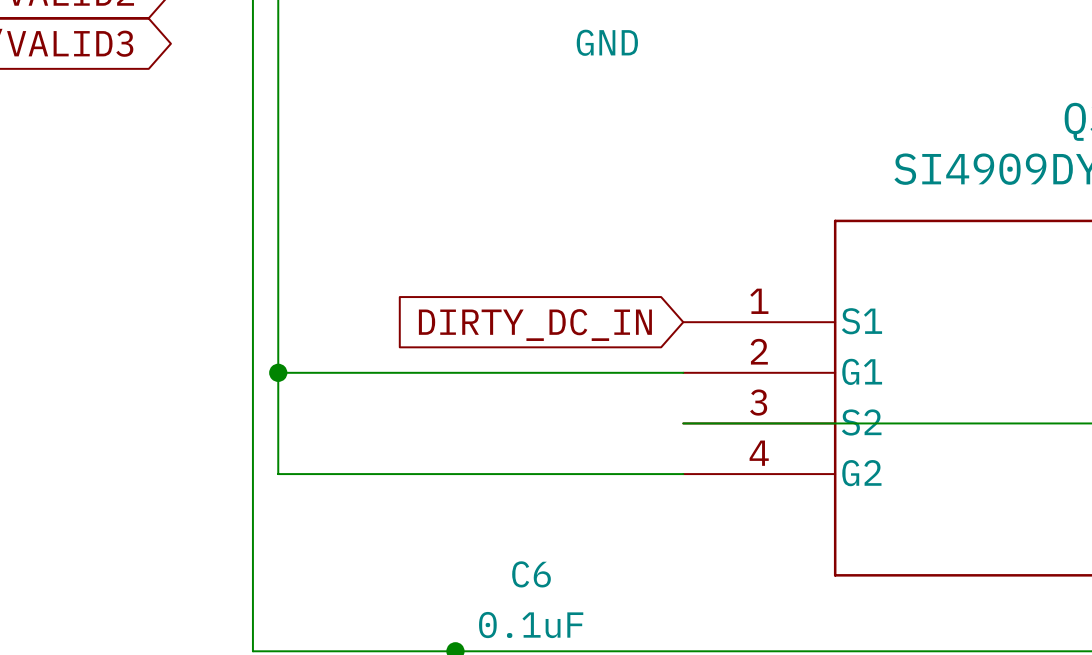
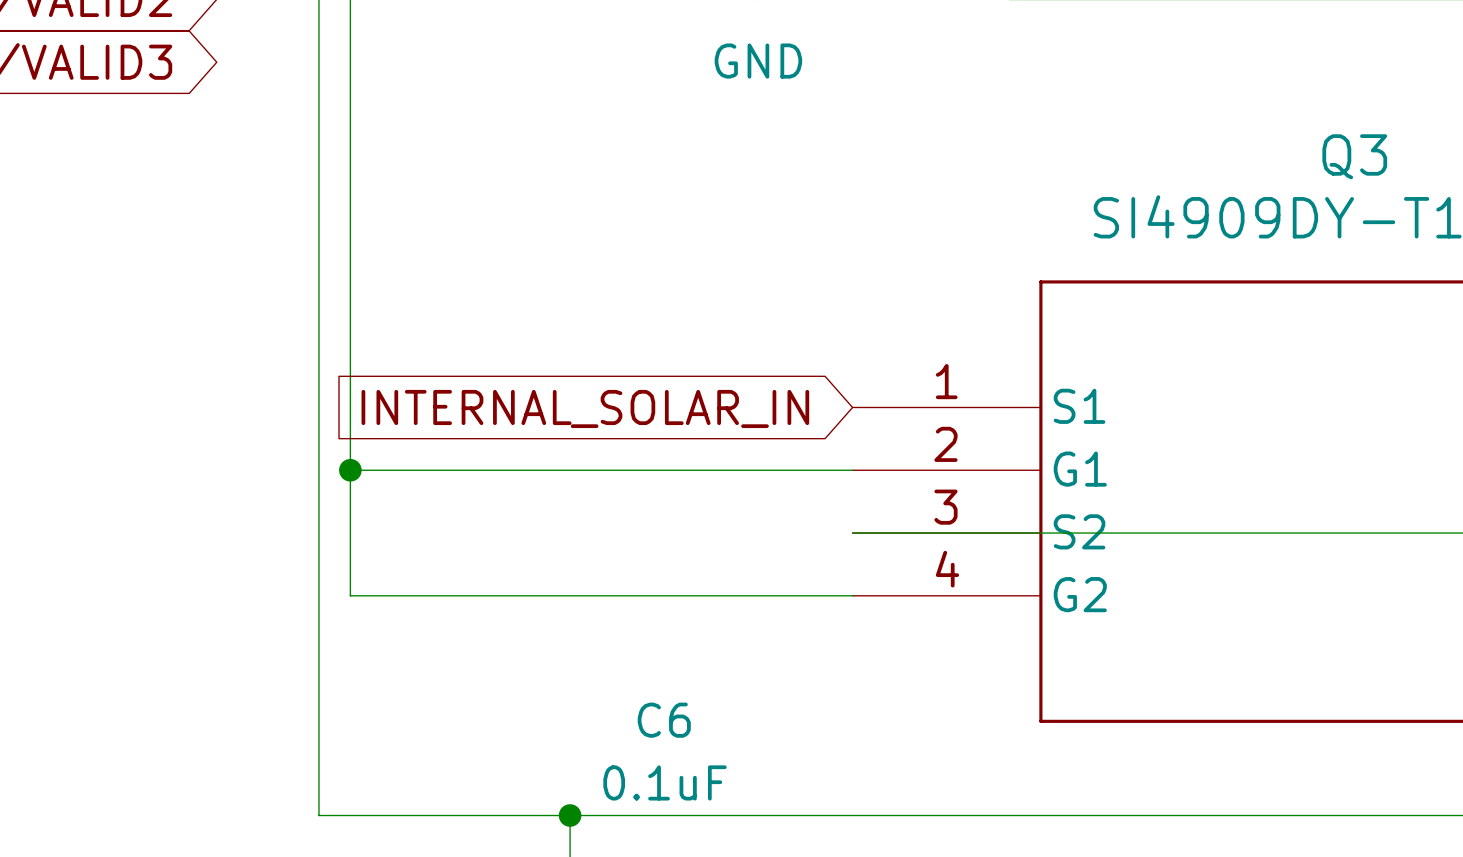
global label: DIRTY_DC_IN (535, 325) -> INTERNAL_SOLAR_IN (585, 408)

